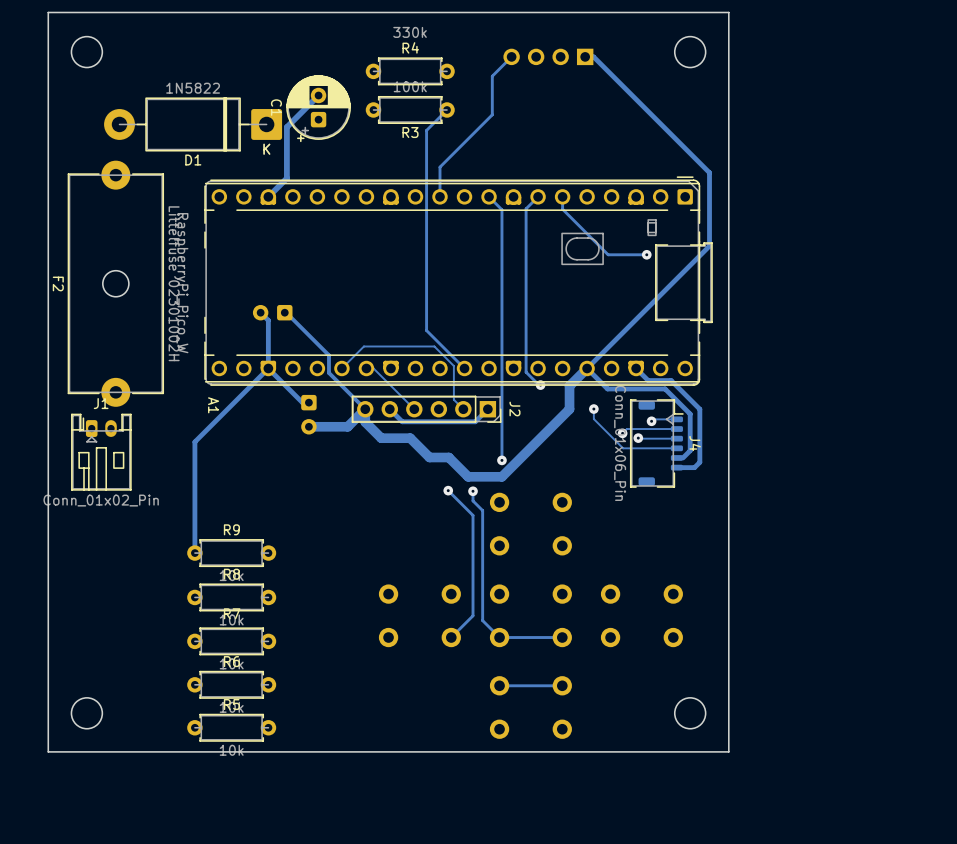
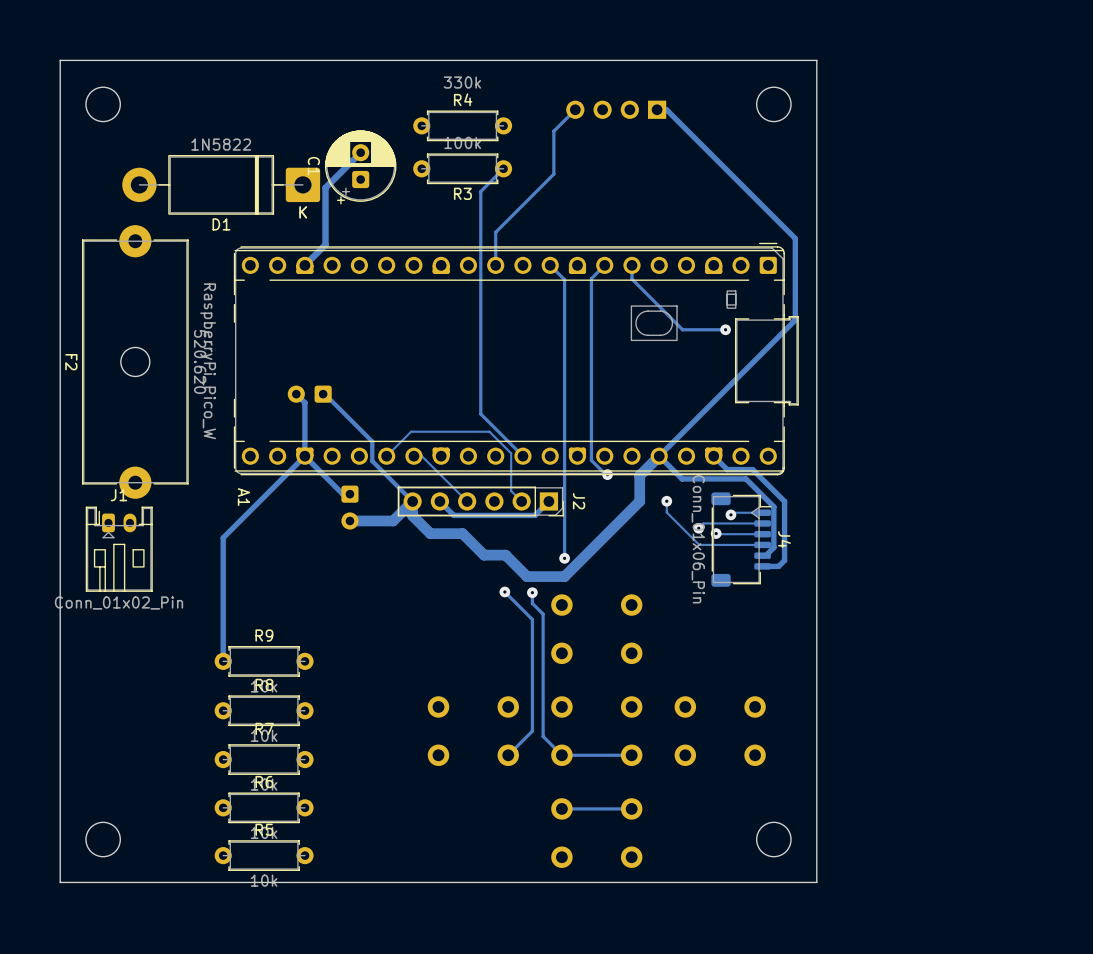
F2 value: Littelfuse 02301002H (174, 283) -> 520.620 (200, 361)
J4 footprint: [630, 399, 684, 488] -> [711, 492, 772, 587]

